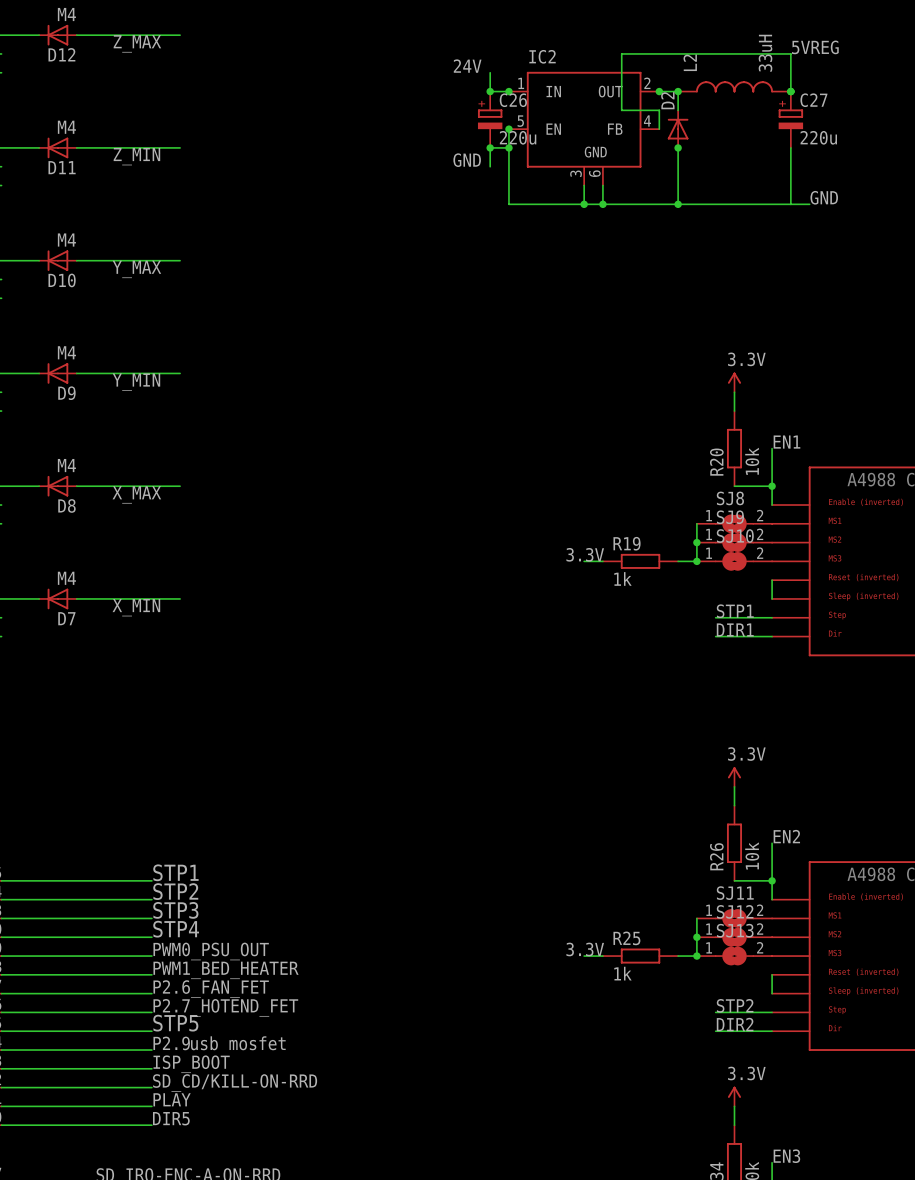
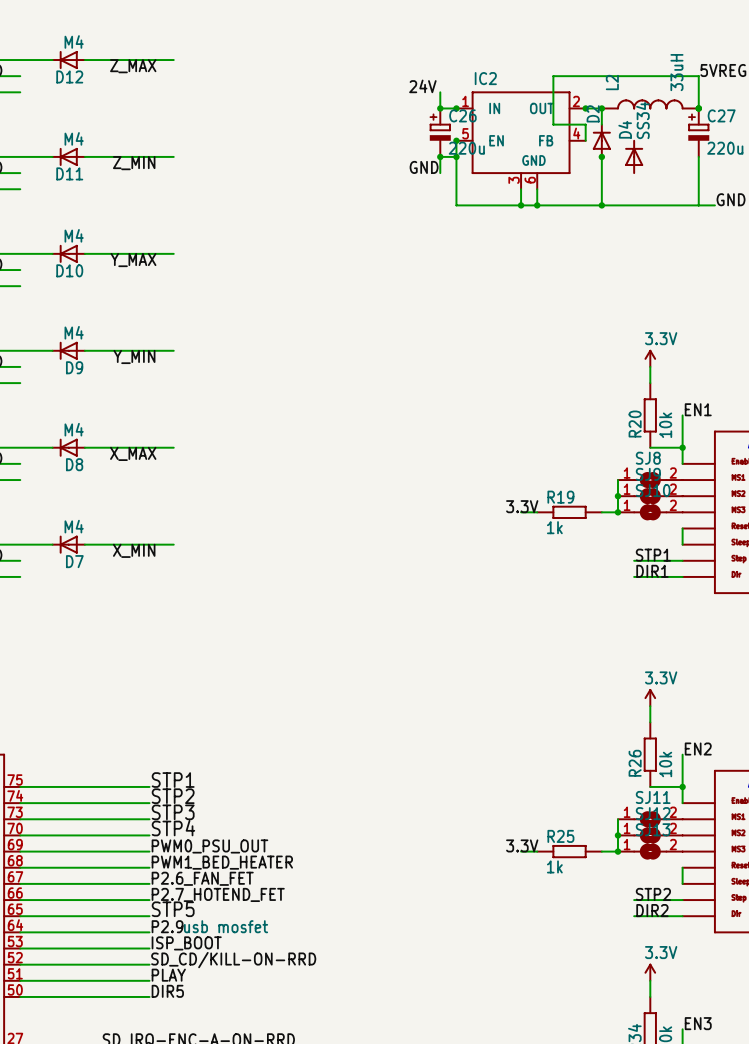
D4: none -> SS34 (634, 156)

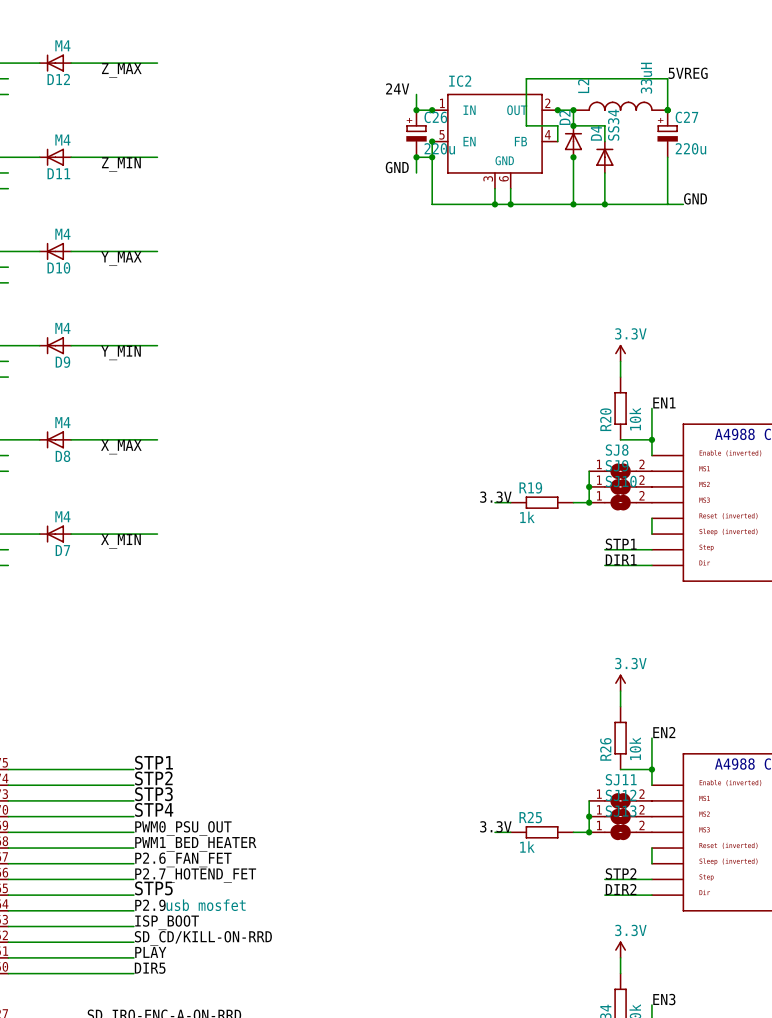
wire: none -> (573, 125) (604, 125) (604, 141)
junction: none -> (573, 125)
wire: none -> (604, 172) (604, 204)
junction: none -> (604, 204)

